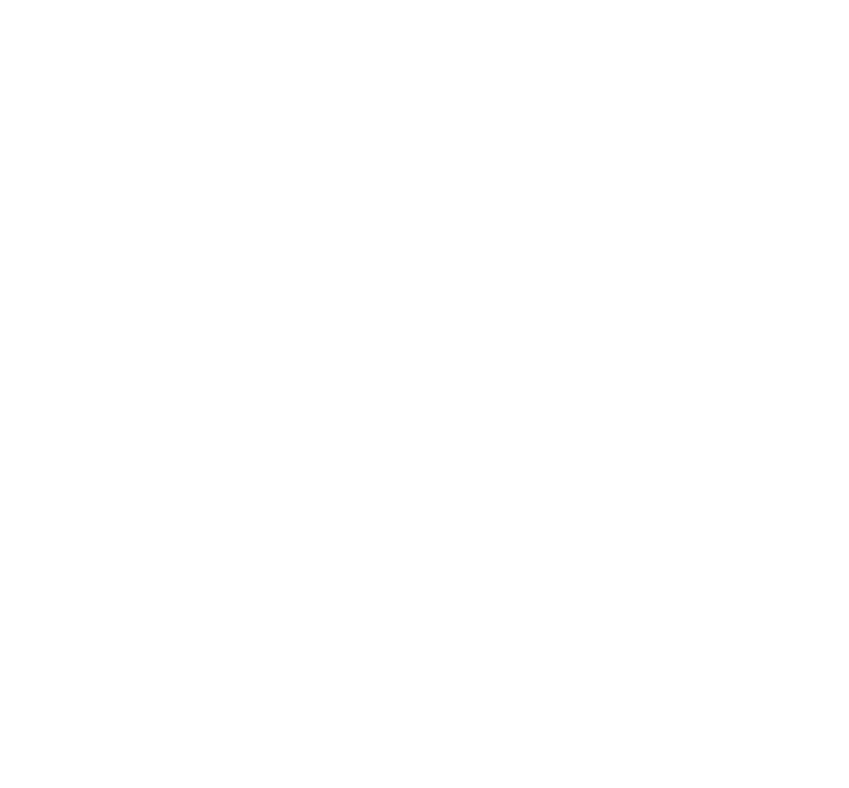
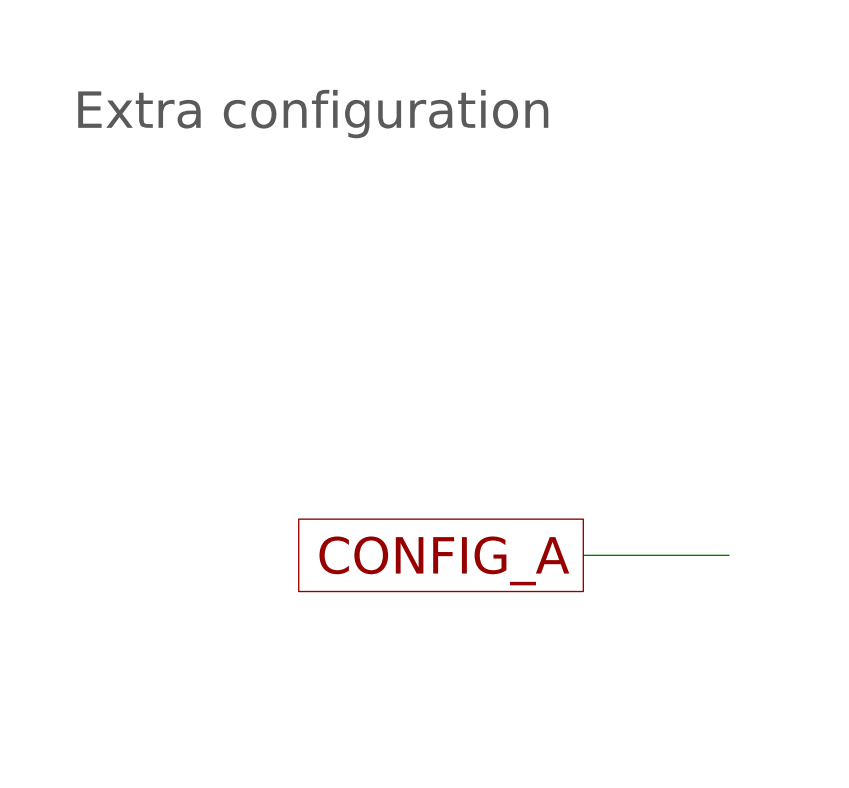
text: none -> Extra configuration (313, 114)
wire: none -> (583, 555) (729, 555)
global label: none -> CONFIG_A (444, 560)

